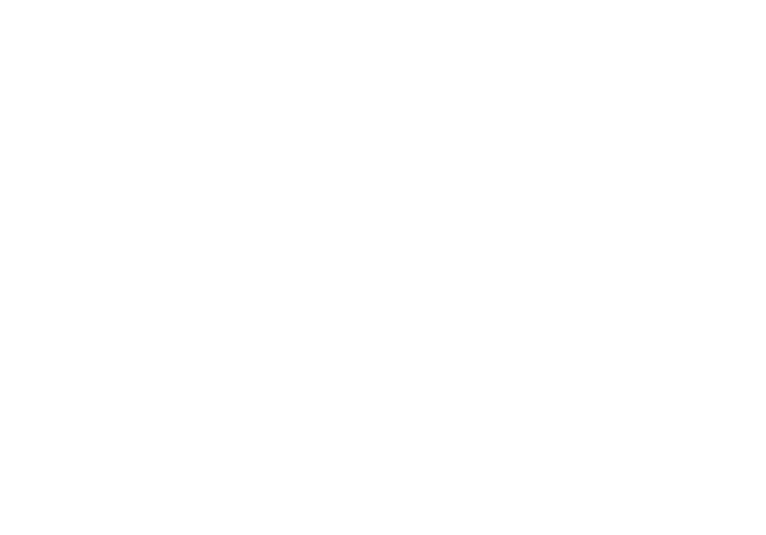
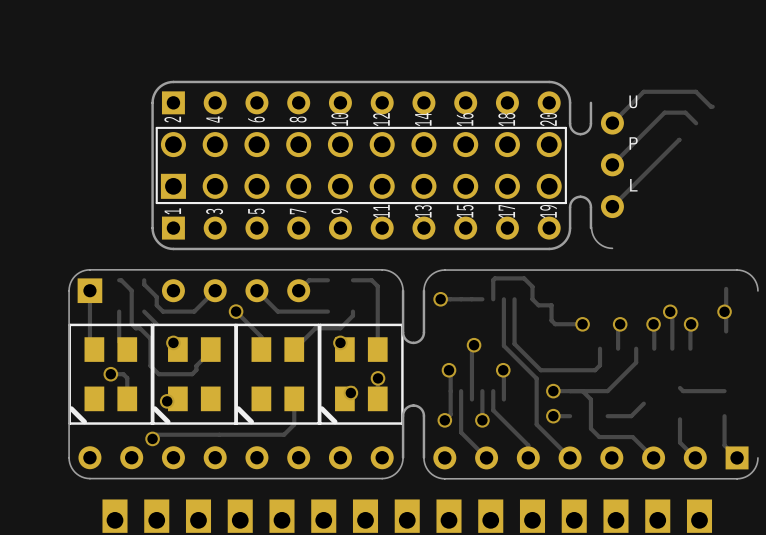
text: none -> U (633, 101)
part: none -> (361, 102)
board edge: none -> (570, 102) (570, 123)
board edge: none -> (570, 102) (568, 94) (563, 88) (557, 83) (549, 81) (168, 82) (158, 88) (152, 100) (152, 230) (158, 242) (165, 247) (173, 248) (551, 248) (559, 246) (567, 238) (569, 230) (570, 204) (574, 198) (580, 196) (586, 198) (590, 204) (590, 228)
board edge: none -> (590, 102) (590, 125) (587, 131) (583, 133) (576, 133) (571, 128) (570, 123)
track: none -> (712, 106) (695, 91) (643, 91) (612, 123)
text: none -> 2 (172, 119)
text: none -> 4 (214, 119)
text: none -> 6 (256, 119)
text: none -> 8 (298, 119)
text: none -> 10 (339, 119)
text: none -> 12 (381, 119)
text: none -> 14 (423, 119)
text: none -> 16 (465, 119)
text: none -> 18 (506, 119)
text: none -> 20 (548, 119)
track: none -> (696, 123) (685, 112) (664, 112) (612, 164)
track: none -> (679, 139) (612, 206)
text: none -> P (633, 143)
part: none -> (612, 164)
part: none -> (361, 165)
text: none -> L (633, 185)
text: none -> 1 (172, 211)
text: none -> 3 (214, 211)
text: none -> 5 (256, 211)
text: none -> 7 (298, 211)
text: none -> 9 (339, 211)
text: none -> 11 (381, 211)
text: none -> 13 (423, 211)
text: none -> 15 (465, 211)
text: none -> 17 (506, 211)
text: none -> 19 (548, 211)
board edge: none -> (591, 227) (593, 235) (597, 242) (604, 246) (612, 248)
part: none -> (361, 228)
board edge: none -> (89, 269) (81, 271) (75, 275) (70, 282) (69, 290) (69, 457) (70, 465) (77, 474) (89, 478) (382, 478)
board edge: none -> (89, 269) (387, 270) (396, 275) (401, 282) (403, 335) (407, 340) (413, 342) (419, 340) (423, 335) (423, 290)
track: none -> (119, 280) (131, 290) (131, 324) (135, 328) (140, 328) (150, 338) (150, 365) (158, 374) (192, 374) (196, 370) (196, 365) (210, 349)
track: none -> (144, 280) (144, 284) (156, 296) (156, 305) (163, 311) (194, 311) (215, 290)
track: none -> (327, 280) (309, 280) (298, 290)
track: none -> (352, 280) (371, 280) (377, 286) (377, 349)
track: none -> (726, 288) (726, 310) (724, 311) (726, 331)
track: none -> (89, 290) (89, 345) (94, 349)
part: none -> (89, 290)
part: none -> (236, 290)
track: none -> (256, 290) (277, 311) (327, 311)
board edge: none -> (423, 290) (428, 278) (434, 272) (442, 270) (737, 270) (745, 271) (751, 276) (756, 282) (757, 290)
track: none -> (440, 299) (482, 299)
via: none -> (440, 299)
track: none -> (493, 299) (493, 280) (494, 278) (524, 278) (532, 286) (532, 299) (538, 305) (551, 305) (551, 320) (555, 324) (582, 324)
track: none -> (503, 299) (503, 345) (536, 378) (536, 424) (570, 457)
track: none -> (514, 299) (514, 343) (540, 370) (595, 370) (600, 365) (600, 348)
track: none -> (119, 311) (119, 341) (127, 349)
track: none -> (144, 311) (156, 324)
track: none -> (236, 311) (261, 336) (261, 349)
via: none -> (236, 311)
track: none -> (352, 311) (352, 315) (340, 328) (315, 328) (294, 349)
track: none -> (670, 311) (672, 313) (672, 348)
via: none -> (670, 311)
via: none -> (724, 311)
via: none -> (582, 324)
track: none -> (620, 324) (618, 326) (618, 348)
via: none -> (620, 324)
track: none -> (653, 324) (654, 348)
via: none -> (653, 324)
track: none -> (691, 324) (690, 348)
via: none -> (691, 324)
via: none -> (173, 342)
via: none -> (340, 342)
track: none -> (474, 345) (471, 347) (471, 399)
via: none -> (474, 345)
track: none -> (636, 348) (636, 362) (607, 391) (553, 391)
track: none -> (449, 370) (450, 371) (450, 414) (444, 420)
via: none -> (449, 370)
track: none -> (503, 370) (503, 399)
via: none -> (503, 370)
track: none -> (110, 374) (123, 374) (127, 378) (127, 398)
part: none -> (110, 374)
via: none -> (110, 374)
part: none -> (194, 374)
part: none -> (277, 374)
part: none -> (361, 374)
via: none -> (378, 378)
track: none -> (680, 387) (683, 391) (724, 391)
track: none -> (461, 391) (461, 432) (486, 457)
track: none -> (482, 391) (482, 420)
track: none -> (493, 391) (493, 410) (528, 445) (528, 457)
via: none -> (553, 391)
track: none -> (582, 391) (590, 399) (590, 428) (599, 437) (632, 437) (653, 457)
via: none -> (350, 393)
track: none -> (294, 398) (294, 424) (284, 434) (156, 434) (152, 438)
via: none -> (167, 401)
track: none -> (643, 403) (631, 416) (607, 416)
board edge: none -> (423, 415) (421, 409) (416, 405) (409, 406) (404, 410) (402, 463) (394, 474) (382, 478)
board edge: none -> (423, 415) (423, 457)
track: none -> (553, 416) (570, 416)
via: none -> (553, 416)
track: none -> (724, 416) (724, 445) (737, 457)
track: none -> (680, 419) (680, 442) (695, 457)
via: none -> (444, 420)
via: none -> (482, 420)
via: none -> (152, 438)
part: none -> (152, 457)
part: none -> (319, 457)
board edge: none -> (423, 457) (425, 465) (430, 472) (436, 477) (444, 478) (739, 478) (751, 472) (756, 465) (757, 457)
part: none -> (590, 457)
part: none -> (198, 516)
part: none -> (407, 516)
part: none -> (616, 516)

